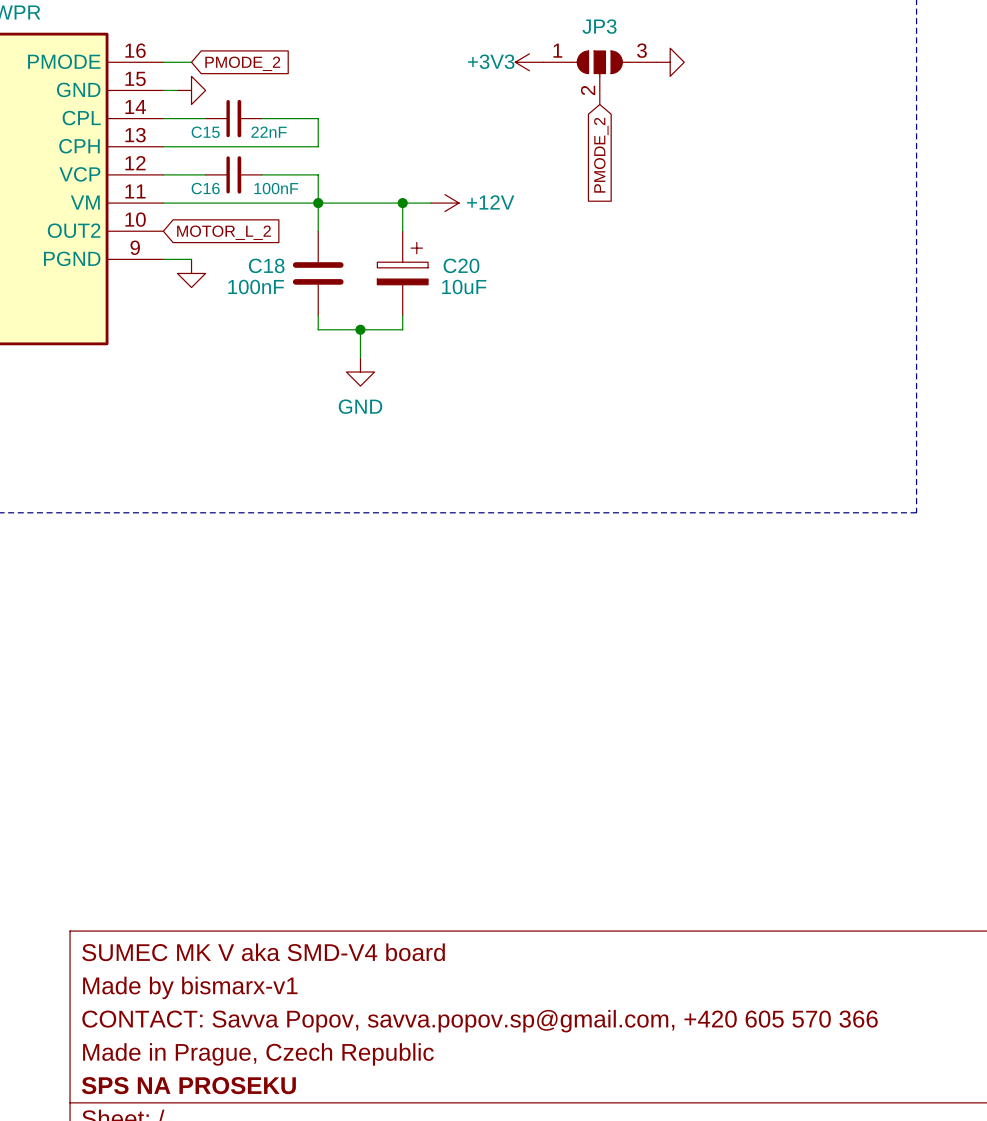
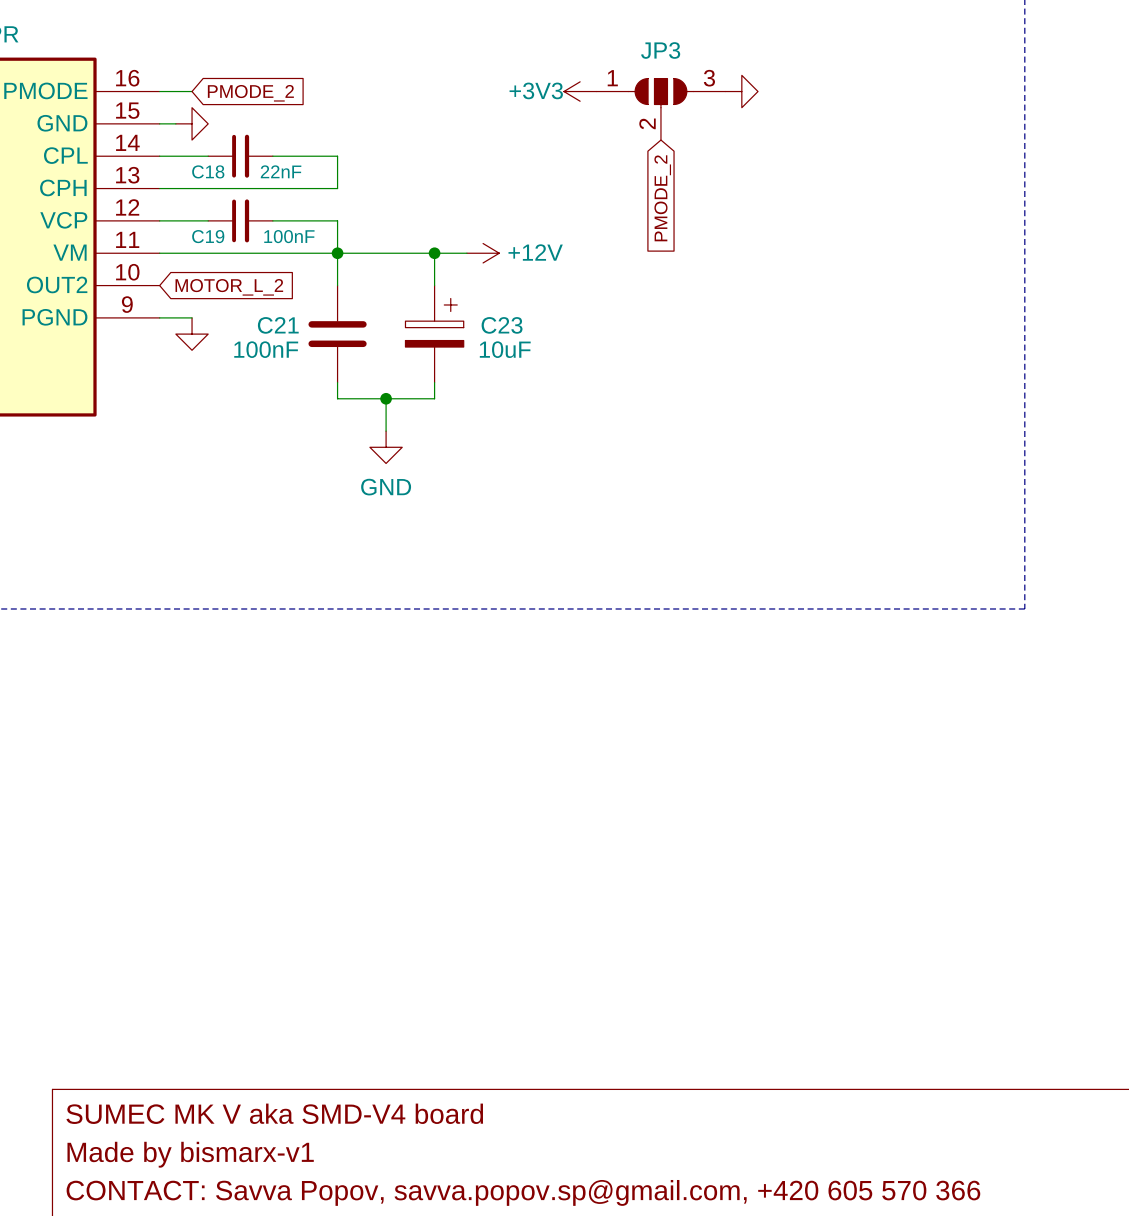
C15 name: C15 (205, 132) -> C18 (208, 171)
C16 name: C16 (205, 188) -> C19 (208, 236)
C18 name: C18 (266, 265) -> C21 (278, 325)
C20 name: C20 (461, 265) -> C23 (502, 325)

